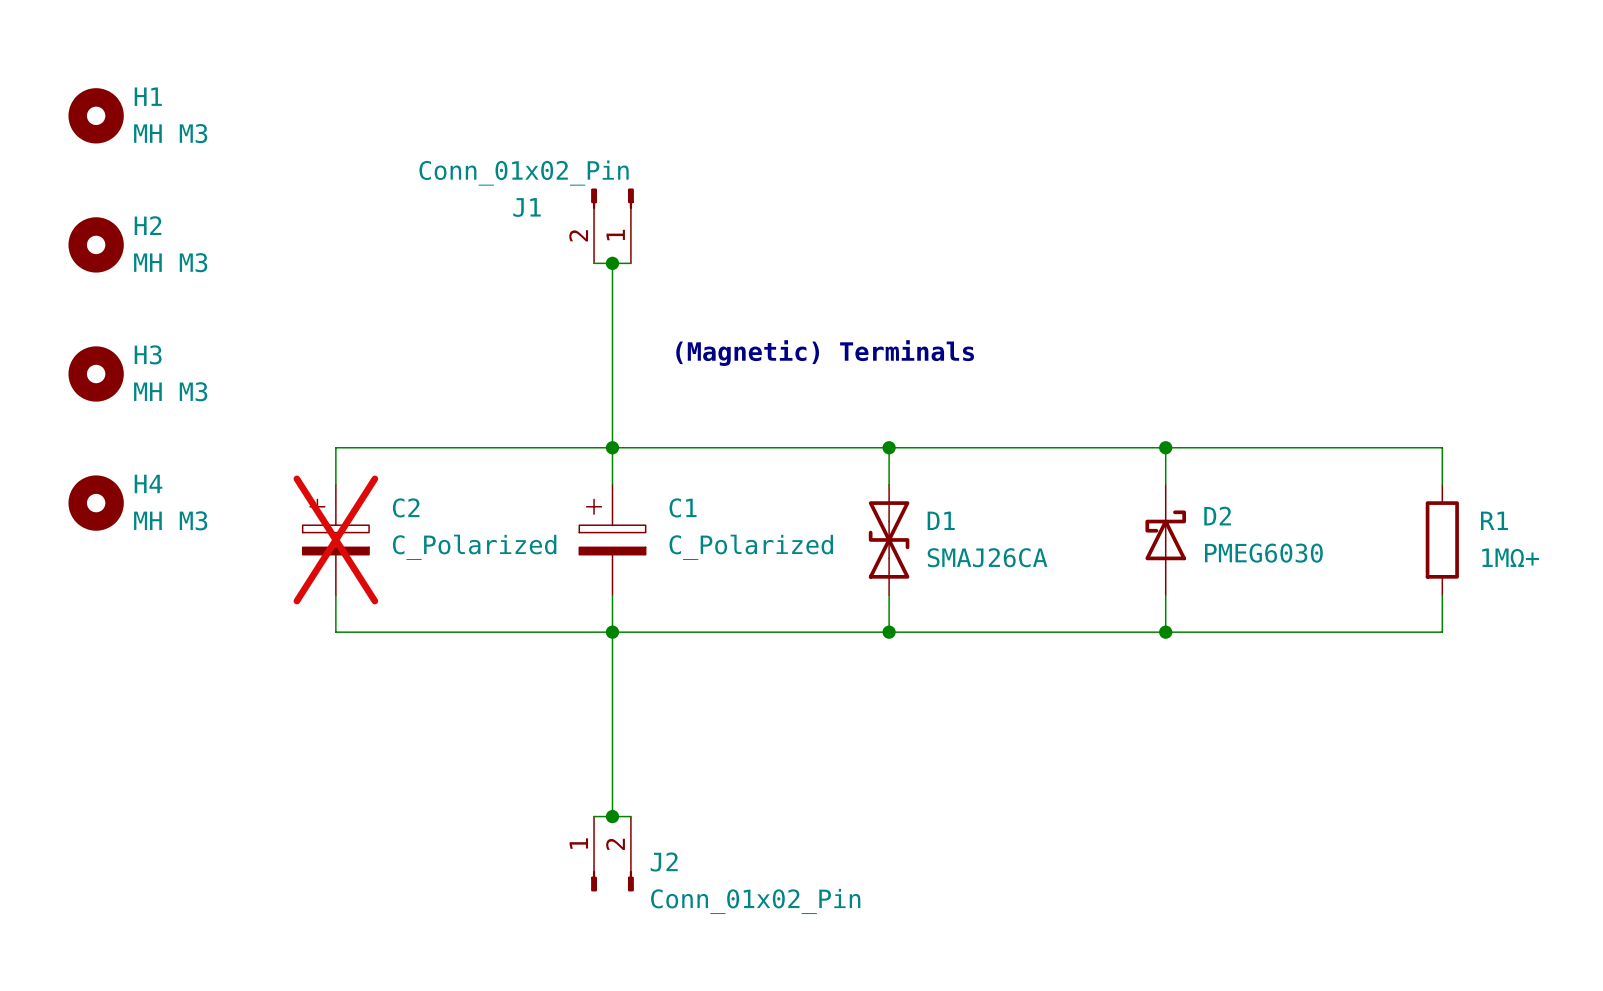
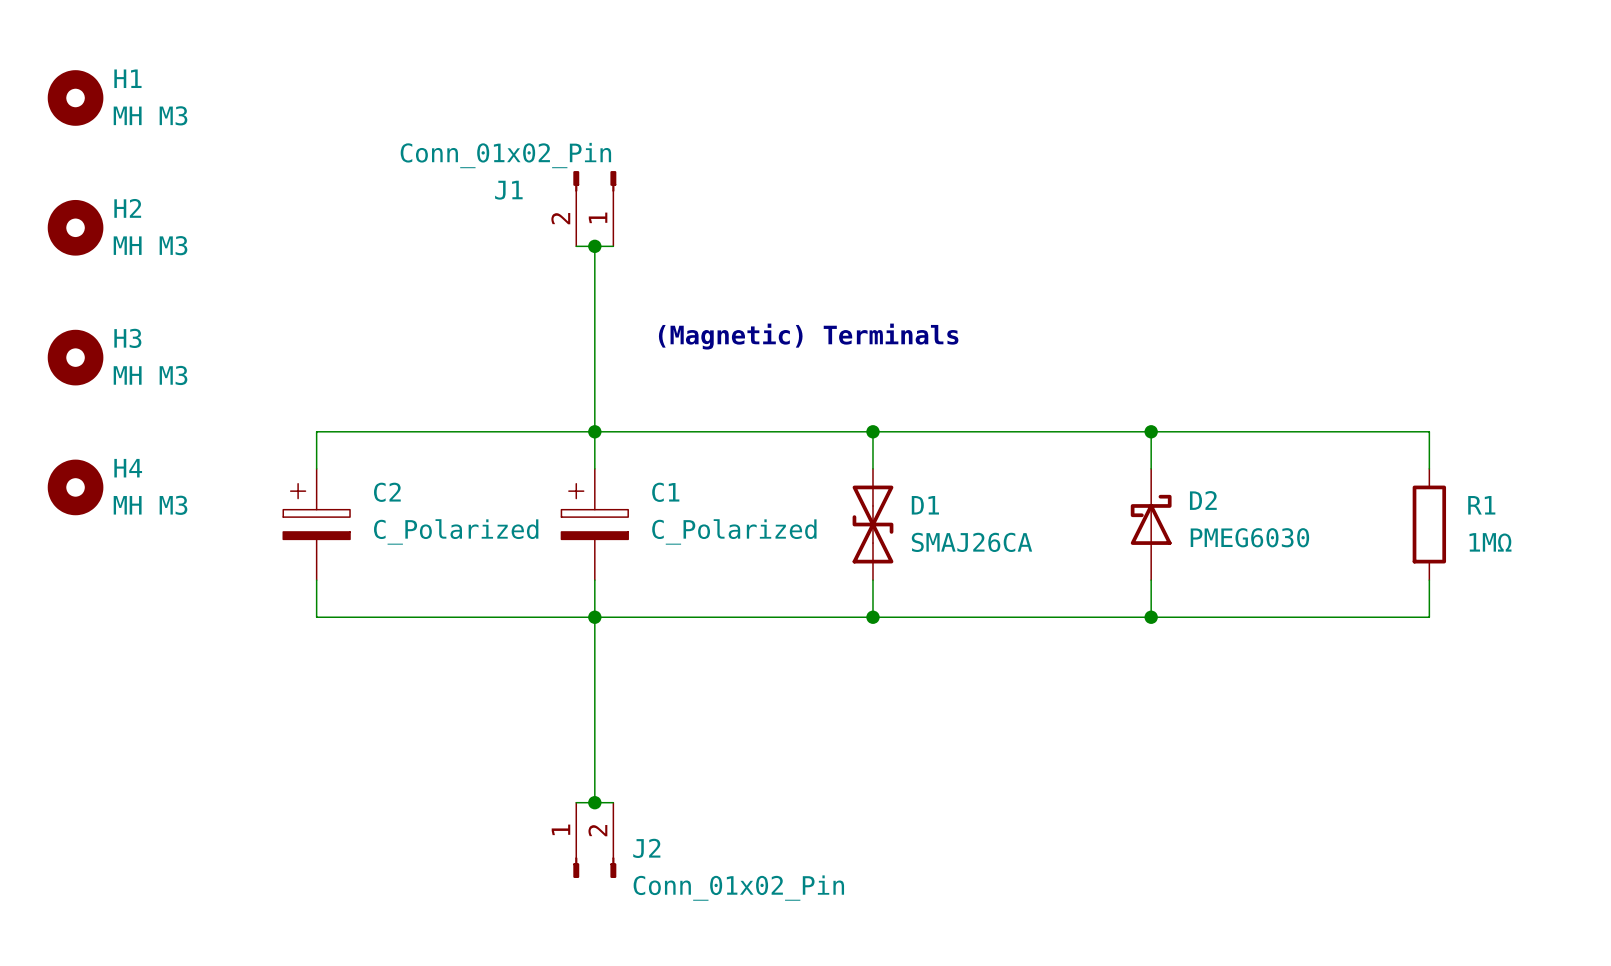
C2 do-not-place cross: (335, 539) -> none
R1 value: 1MΩ+ (1510, 557) -> 1MΩ (1490, 542)

